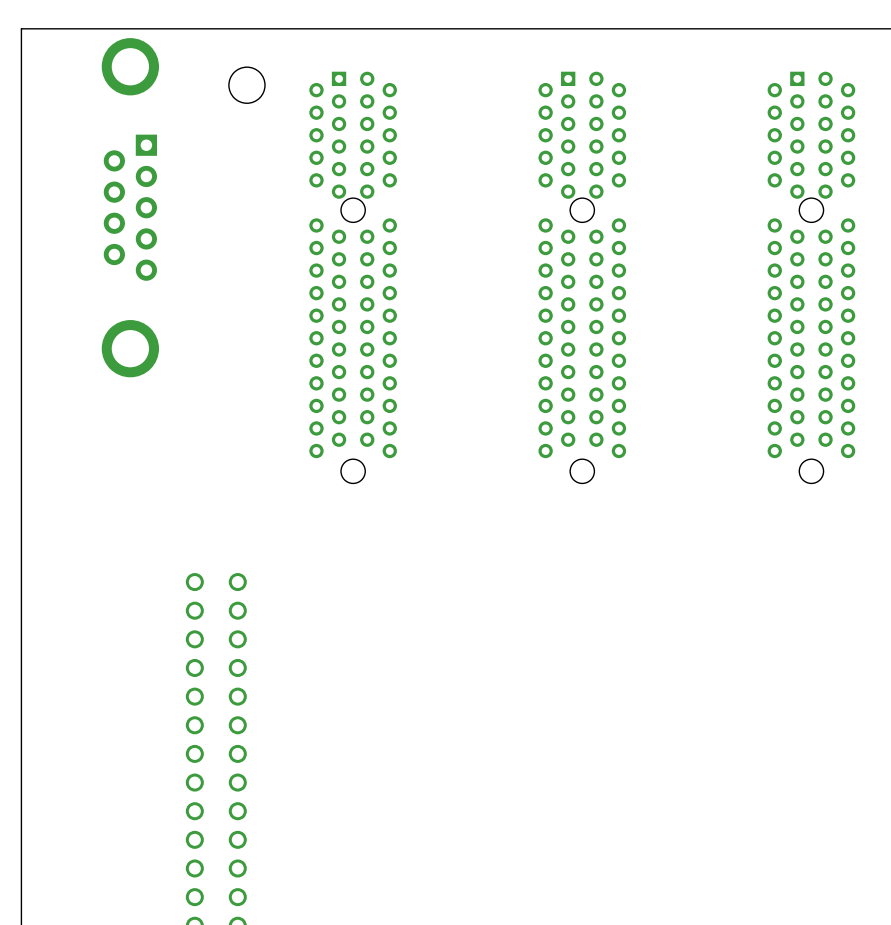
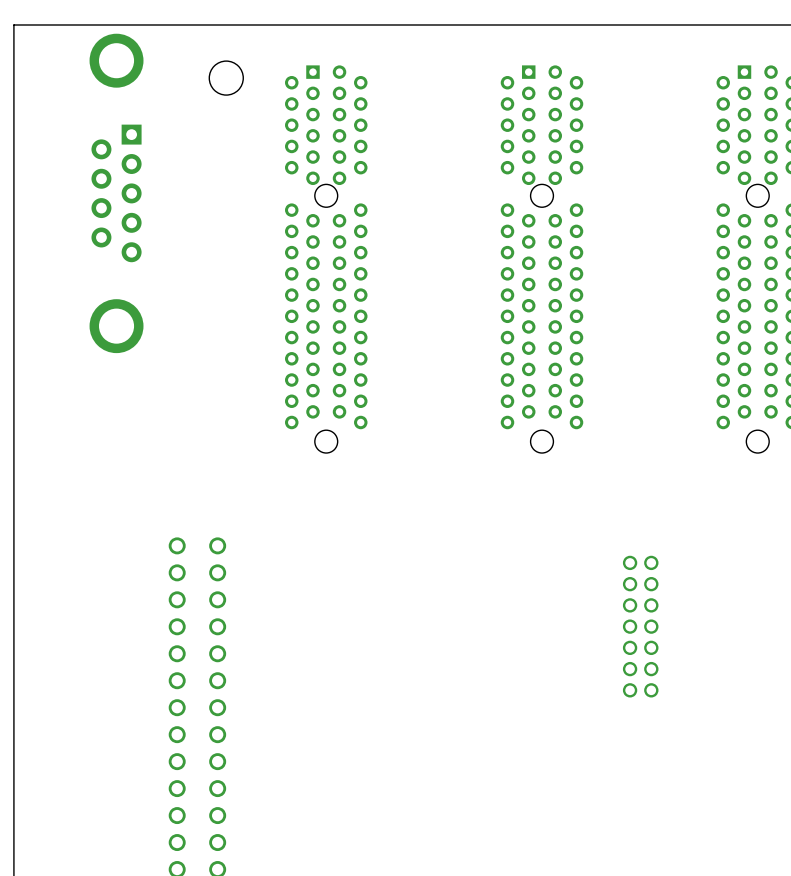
part: none -> (640, 626)

